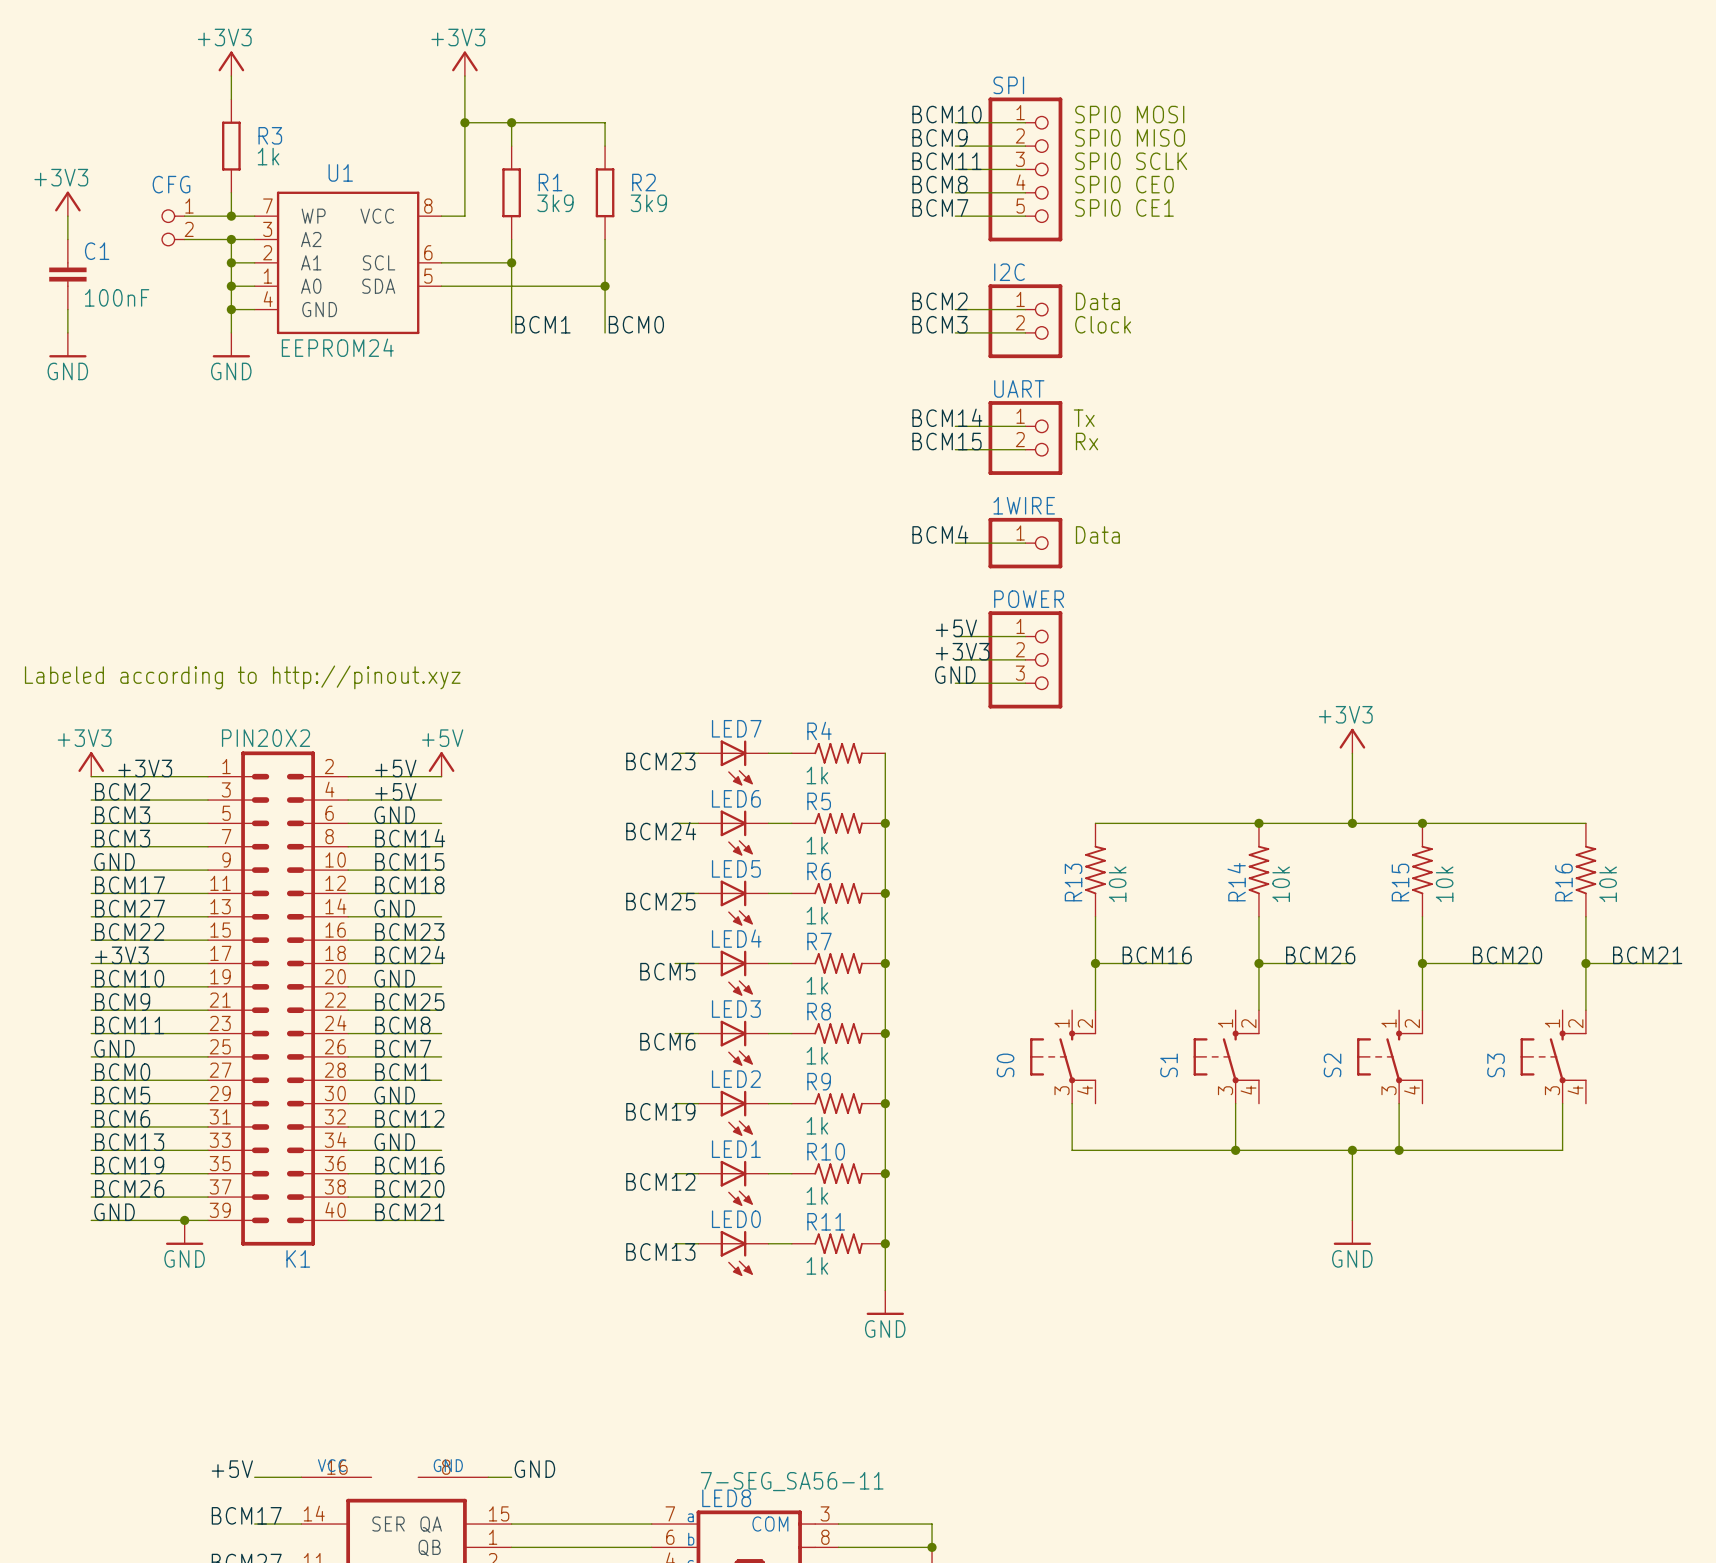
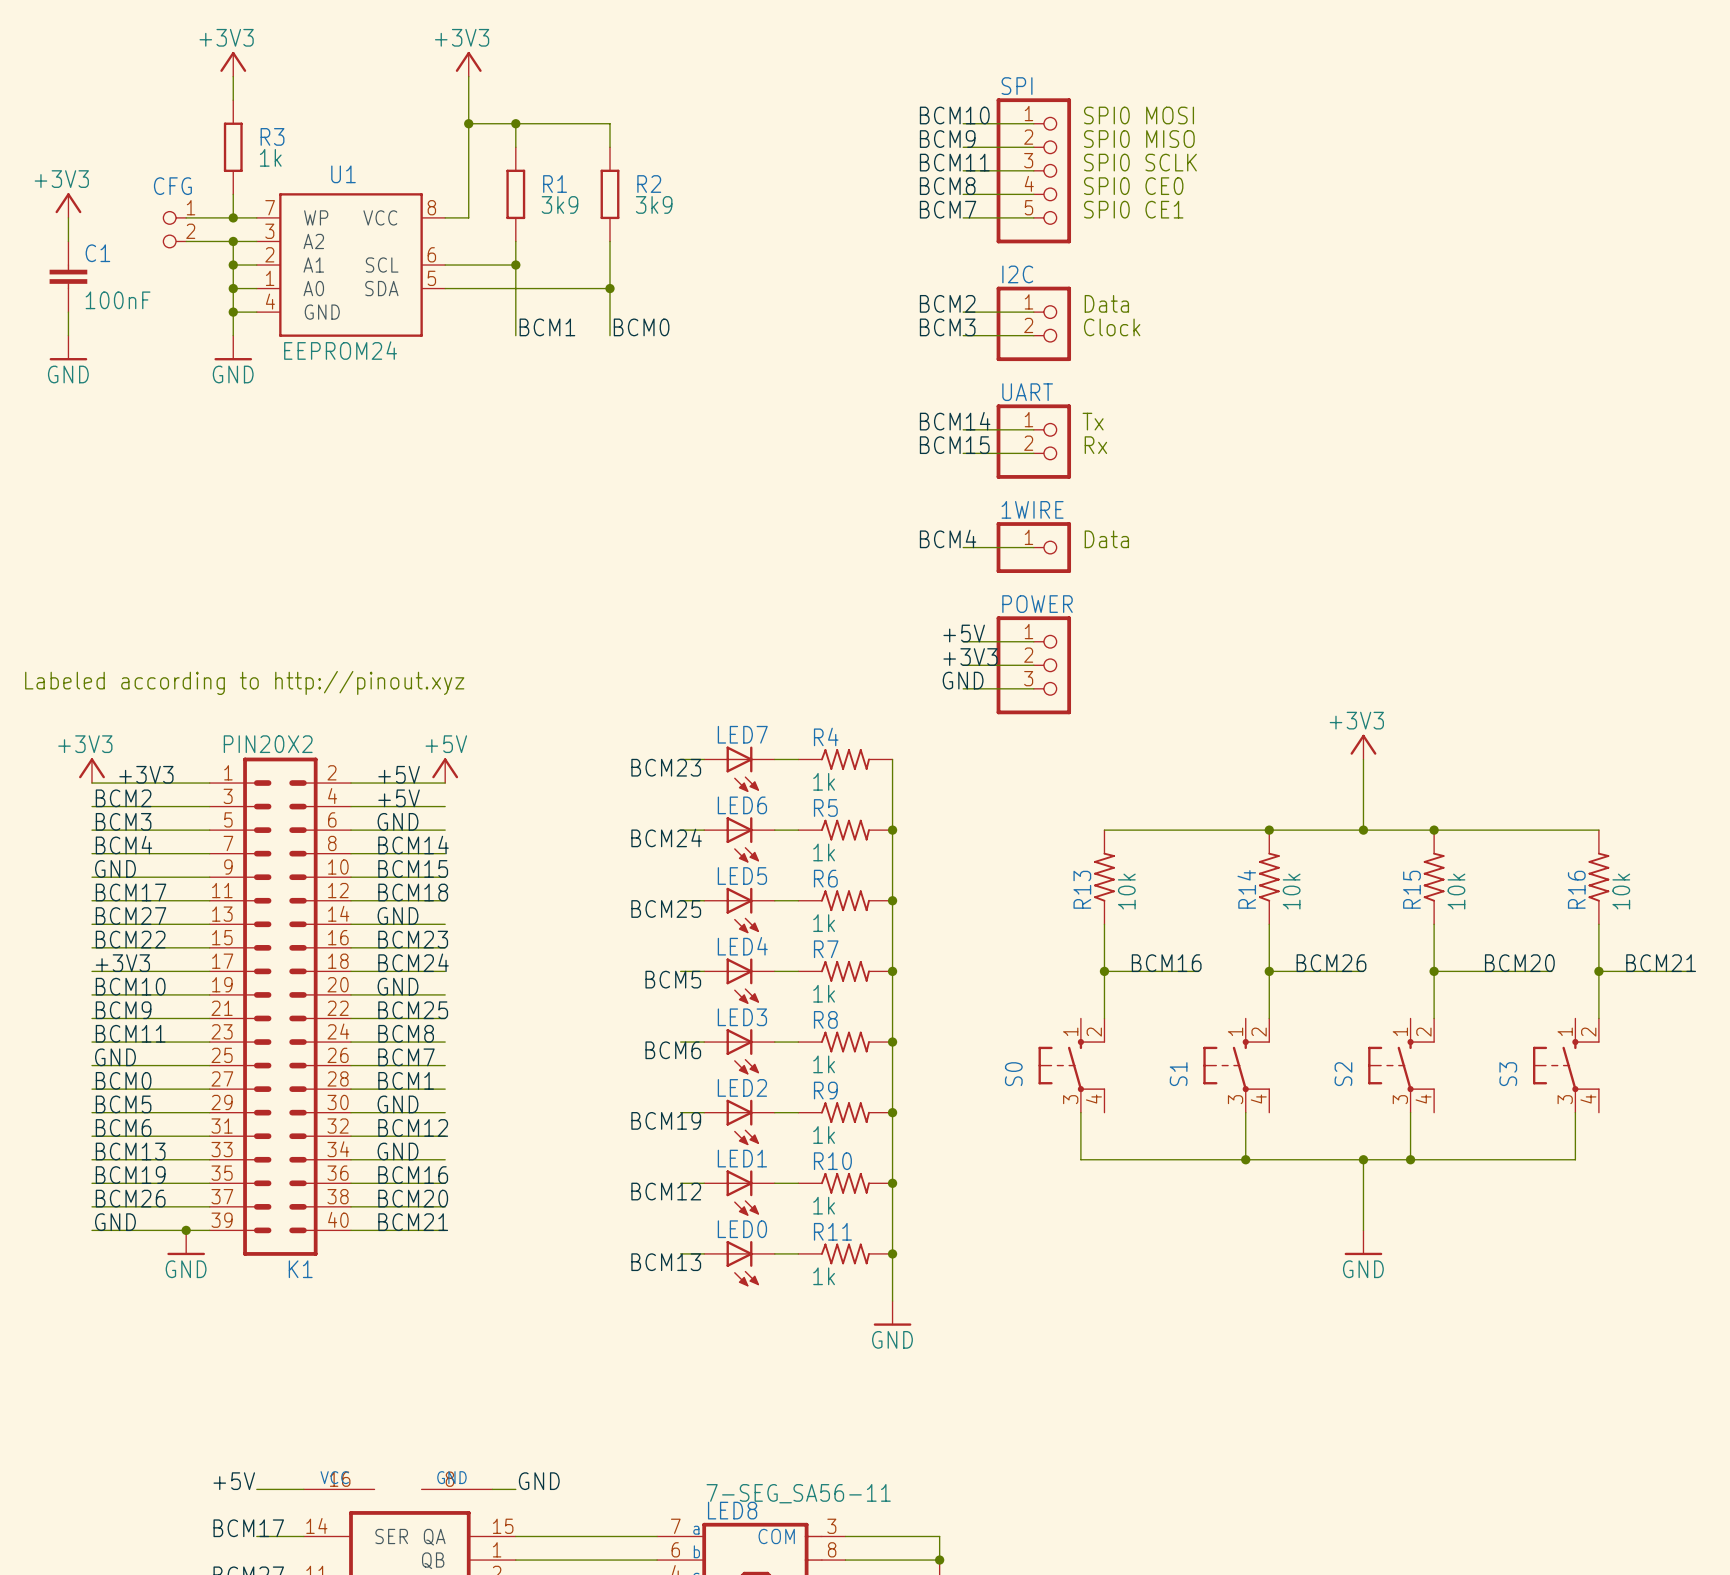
label: BCM3 (122, 838) -> BCM4 (123, 845)

